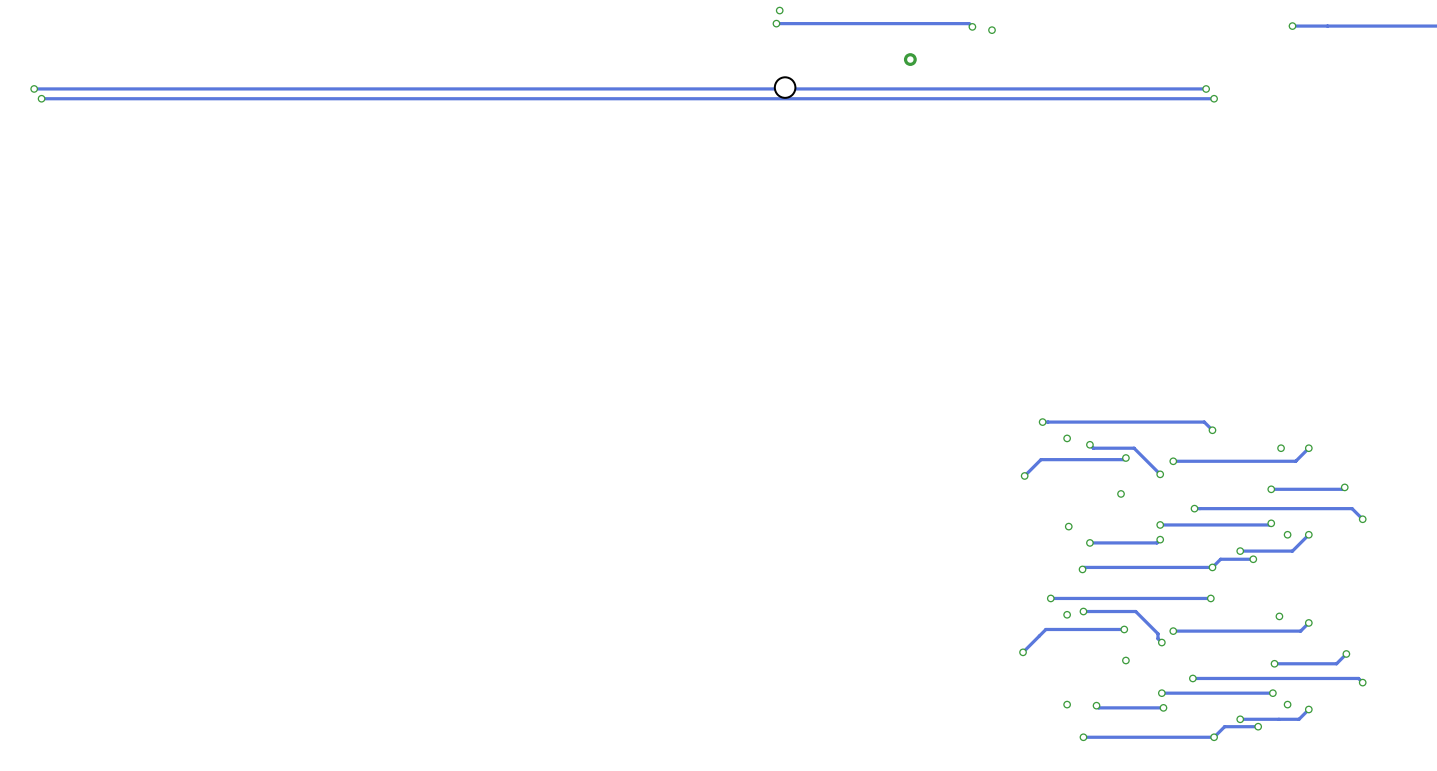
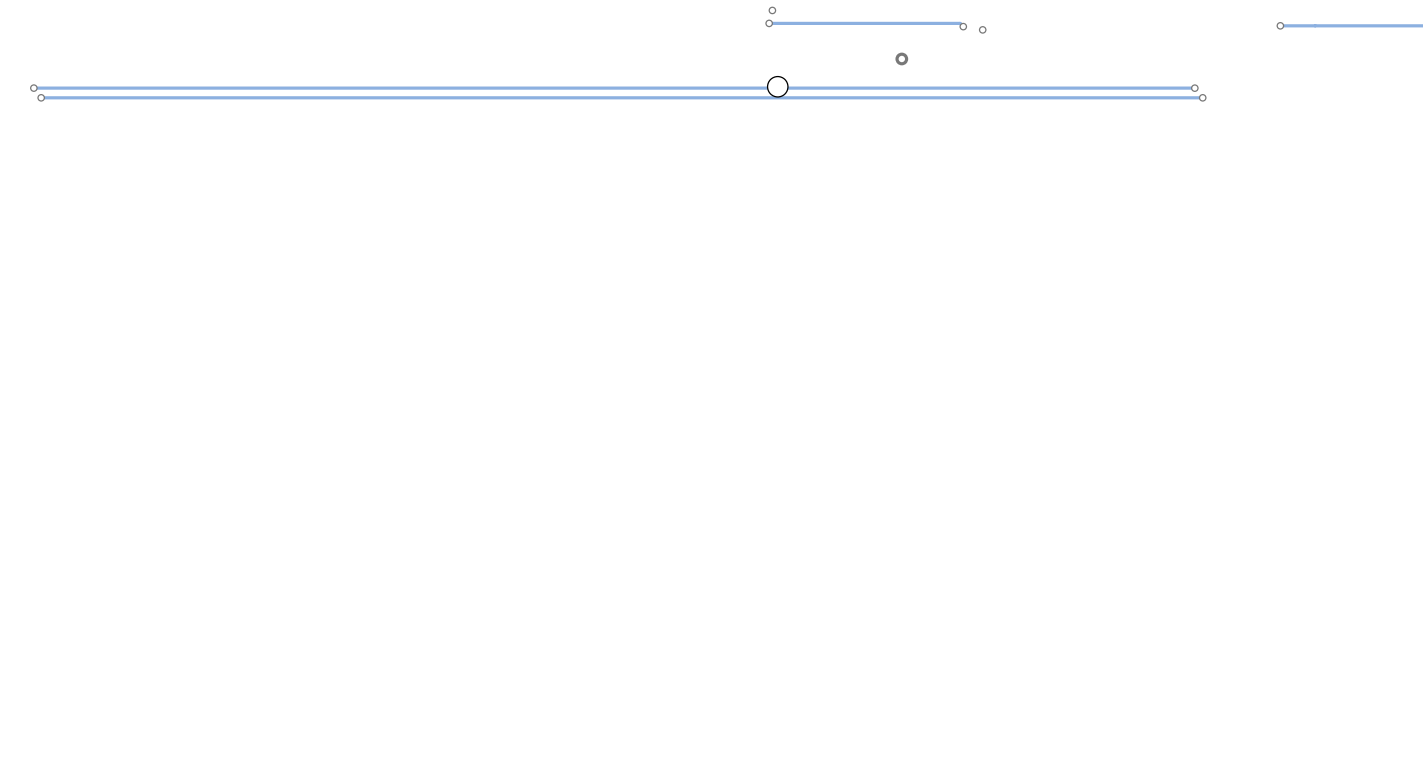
track: (1042, 422) (1204, 422) (1212, 430) -> none
via: (1042, 422) -> none
via: (1212, 430) -> none
via: (1067, 438) -> none
track: (1089, 444) (1093, 448) (1134, 448) (1160, 474) -> none
via: (1089, 444) -> none
via: (1281, 448) -> none
track: (1308, 448) (1295, 461) (1173, 461) -> none
via: (1308, 448) -> none
track: (1125, 458) (1124, 459) (1040, 459) (1024, 475) -> none
via: (1125, 458) -> none
via: (1173, 461) -> none
via: (1160, 474) -> none
via: (1024, 475) -> none
track: (1344, 487) (1342, 489) (1271, 489) -> none
via: (1344, 487) -> none
via: (1271, 489) -> none
via: (1121, 493) -> none
track: (1194, 508) (1352, 508) (1362, 519) -> none
via: (1194, 508) -> none
via: (1362, 519) -> none
track: (1271, 523) (1269, 524) (1160, 524) -> none
via: (1271, 523) -> none
via: (1160, 524) -> none
via: (1068, 526) -> none
via: (1287, 534) -> none
track: (1308, 534) (1292, 551) (1240, 551) -> none
via: (1308, 534) -> none
track: (1160, 539) (1156, 542) (1089, 542) -> none
via: (1160, 539) -> none
via: (1089, 542) -> none
via: (1240, 551) -> none
track: (1253, 559) (1220, 559) (1212, 567) (1084, 567) (1082, 569) -> none
via: (1253, 559) -> none
via: (1212, 567) -> none
via: (1082, 569) -> none
via: (1050, 598) -> none
track: (1210, 598) (1050, 598) -> none
via: (1210, 598) -> none
track: (1083, 611) (1135, 611) (1157, 633) (1157, 638) (1161, 642) -> none
via: (1083, 611) -> none
via: (1067, 614) -> none
via: (1279, 616) -> none
track: (1308, 622) (1300, 631) (1173, 631) -> none
via: (1308, 622) -> none
track: (1124, 629) (1045, 629) (1023, 652) -> none
via: (1124, 629) -> none
via: (1173, 631) -> none
via: (1161, 642) -> none
via: (1023, 652) -> none
track: (1346, 653) (1336, 663) (1274, 663) -> none
via: (1346, 653) -> none
via: (1125, 660) -> none
via: (1274, 663) -> none
track: (1192, 678) (1358, 678) (1362, 682) -> none
via: (1192, 678) -> none
via: (1362, 682) -> none
via: (1161, 693) -> none
track: (1272, 693) (1161, 693) -> none
via: (1272, 693) -> none
via: (1067, 704) -> none
via: (1287, 704) -> none
track: (1096, 705) (1098, 707) (1163, 707) -> none
via: (1096, 705) -> none
via: (1163, 707) -> none
track: (1308, 709) (1299, 719) (1240, 719) -> none
via: (1308, 709) -> none
via: (1240, 719) -> none
track: (1258, 726) (1224, 726) (1214, 737) (1083, 737) -> none
via: (1258, 726) -> none
via: (1083, 737) -> none
via: (1214, 737) -> none

